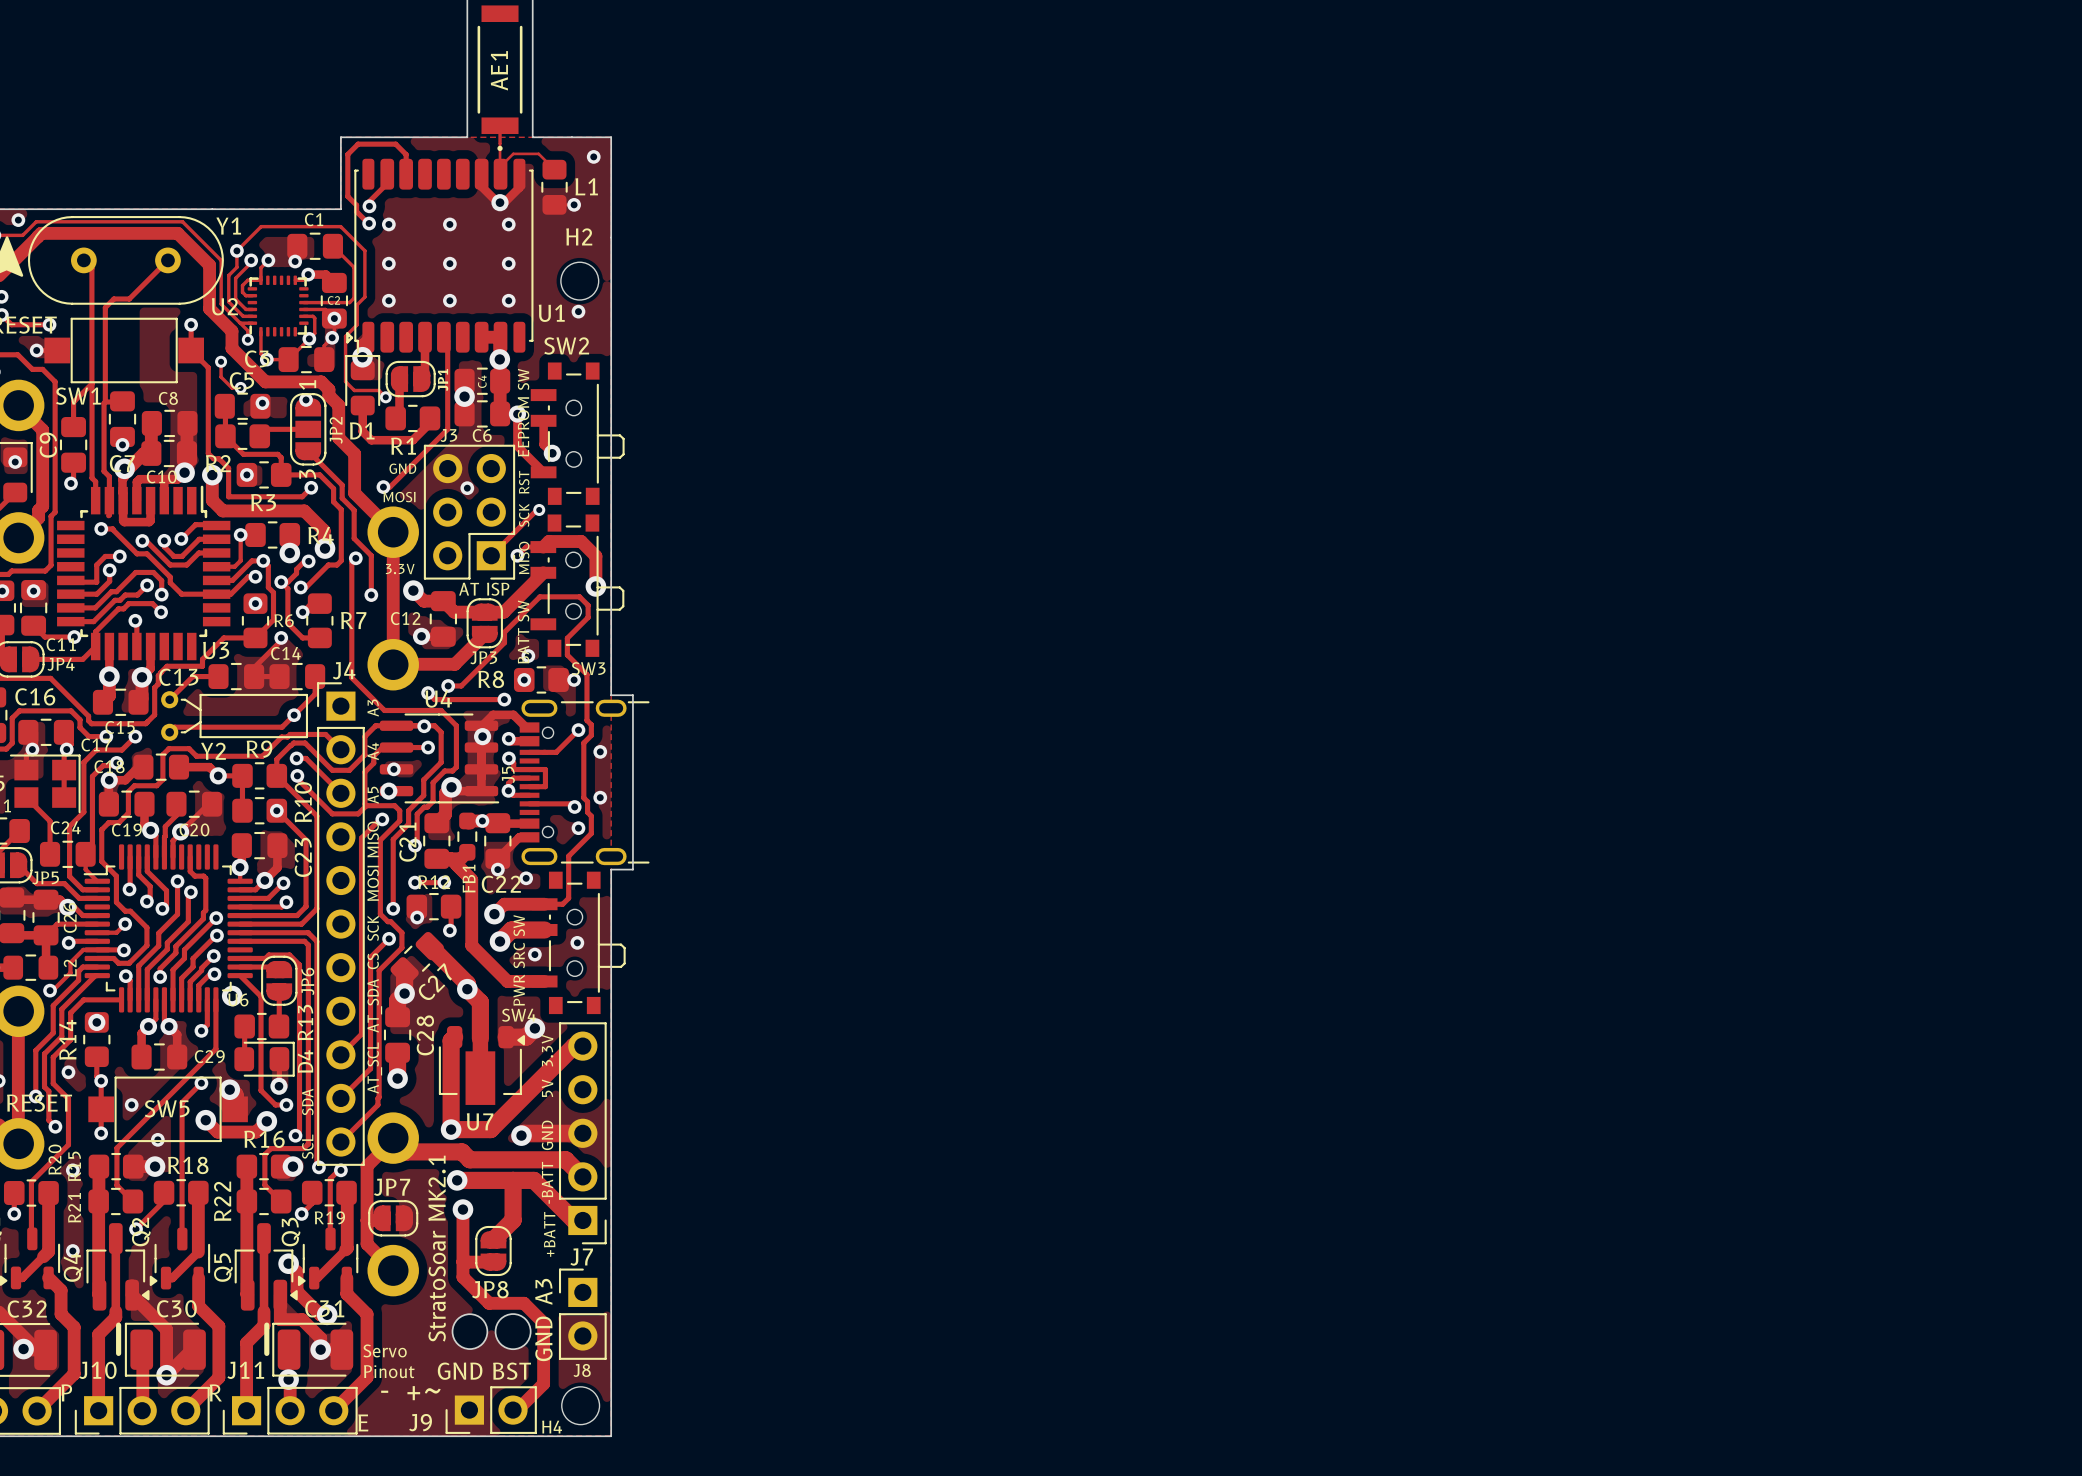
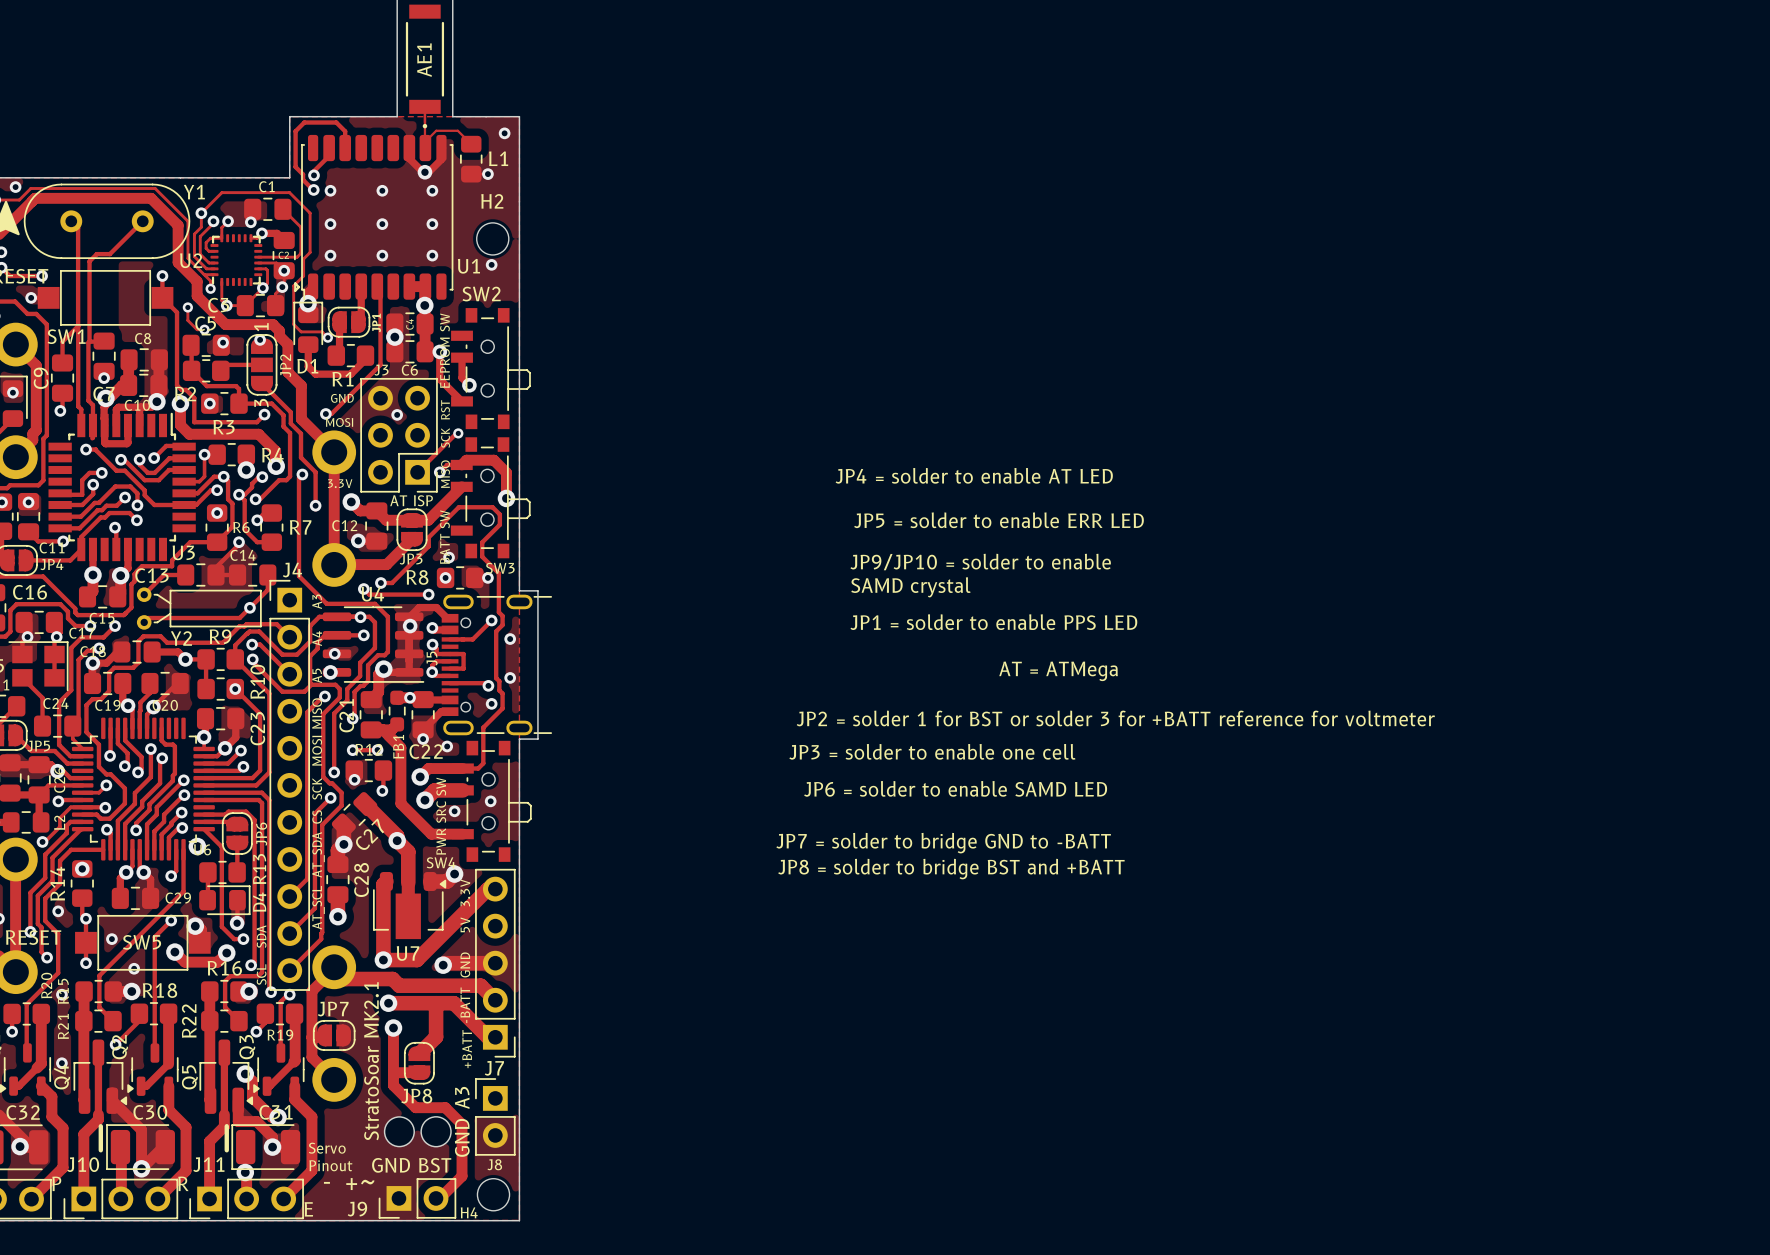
text: none -> JP4 = solder to enable AT LED (974, 475)
text: none -> JP5 = solder to enable ERR LED (999, 520)
text: none -> JP9/JP10 = solder to enable (980, 562)
text: none -> SAMD crystal (910, 587)
text: none -> JP1 = solder to enable PPS LED (993, 622)
text: none -> AT = ATMega (1058, 671)
text: none -> JP2 = solder 1 for BST or solder 3 for +BATT reference for voltmeter (1115, 718)
text: none -> JP3 = solder to enable one cell (932, 751)
text: none -> JP6 = solder to enable SAMD LED (955, 788)
text: none -> JP7 = solder to bridge GND to -BATT (943, 843)
text: none -> JP8 = solder to bridge BST and +BATT (951, 869)

